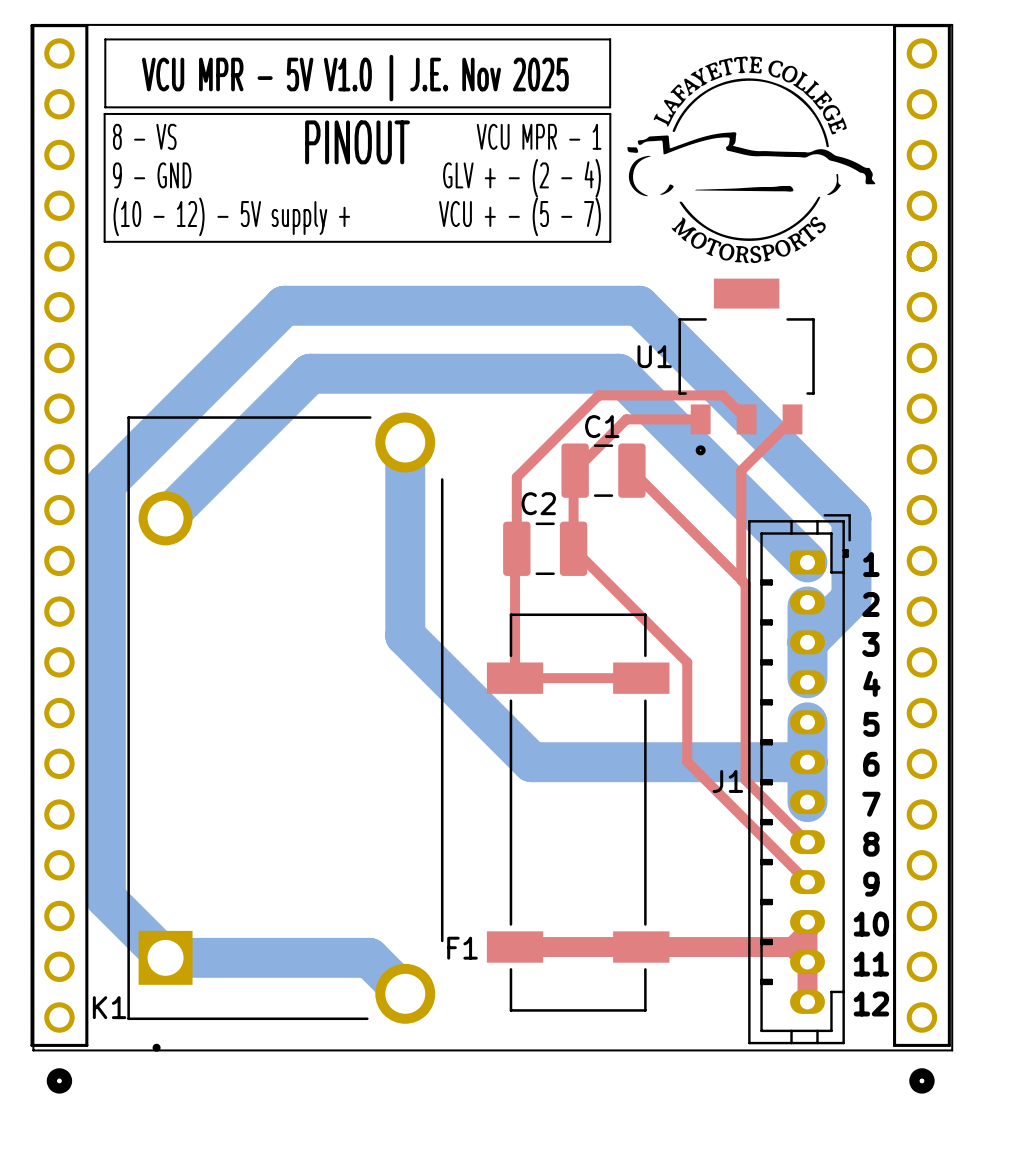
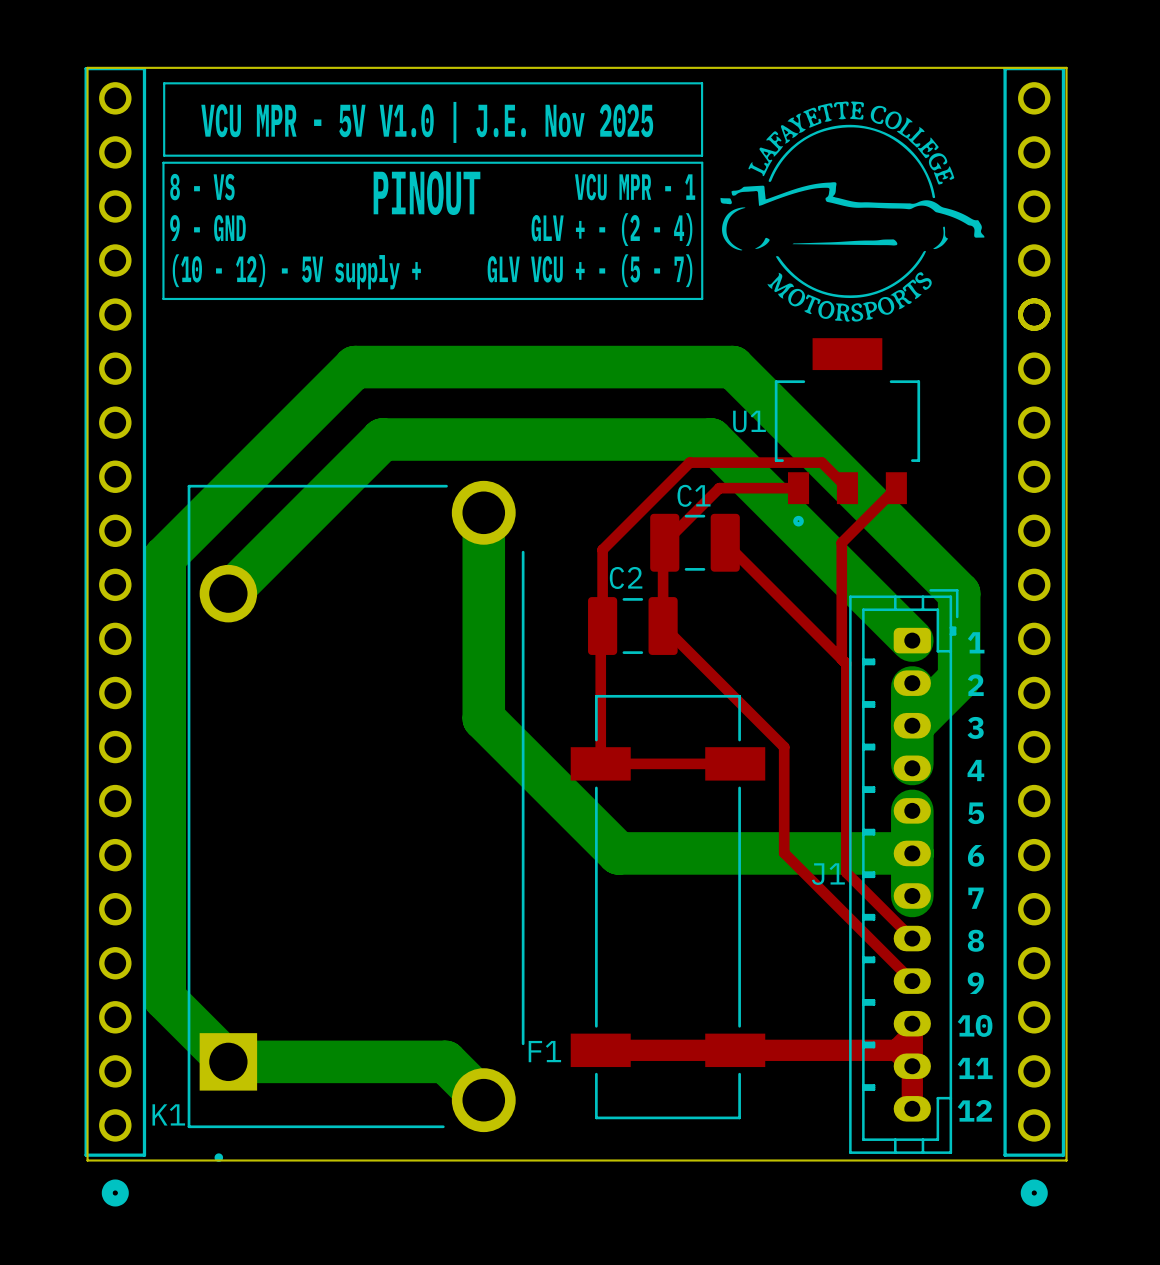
text: VCU + - (5 - 7) (519, 216) -> GLV VCU + - (5 - 7) (590, 270)

